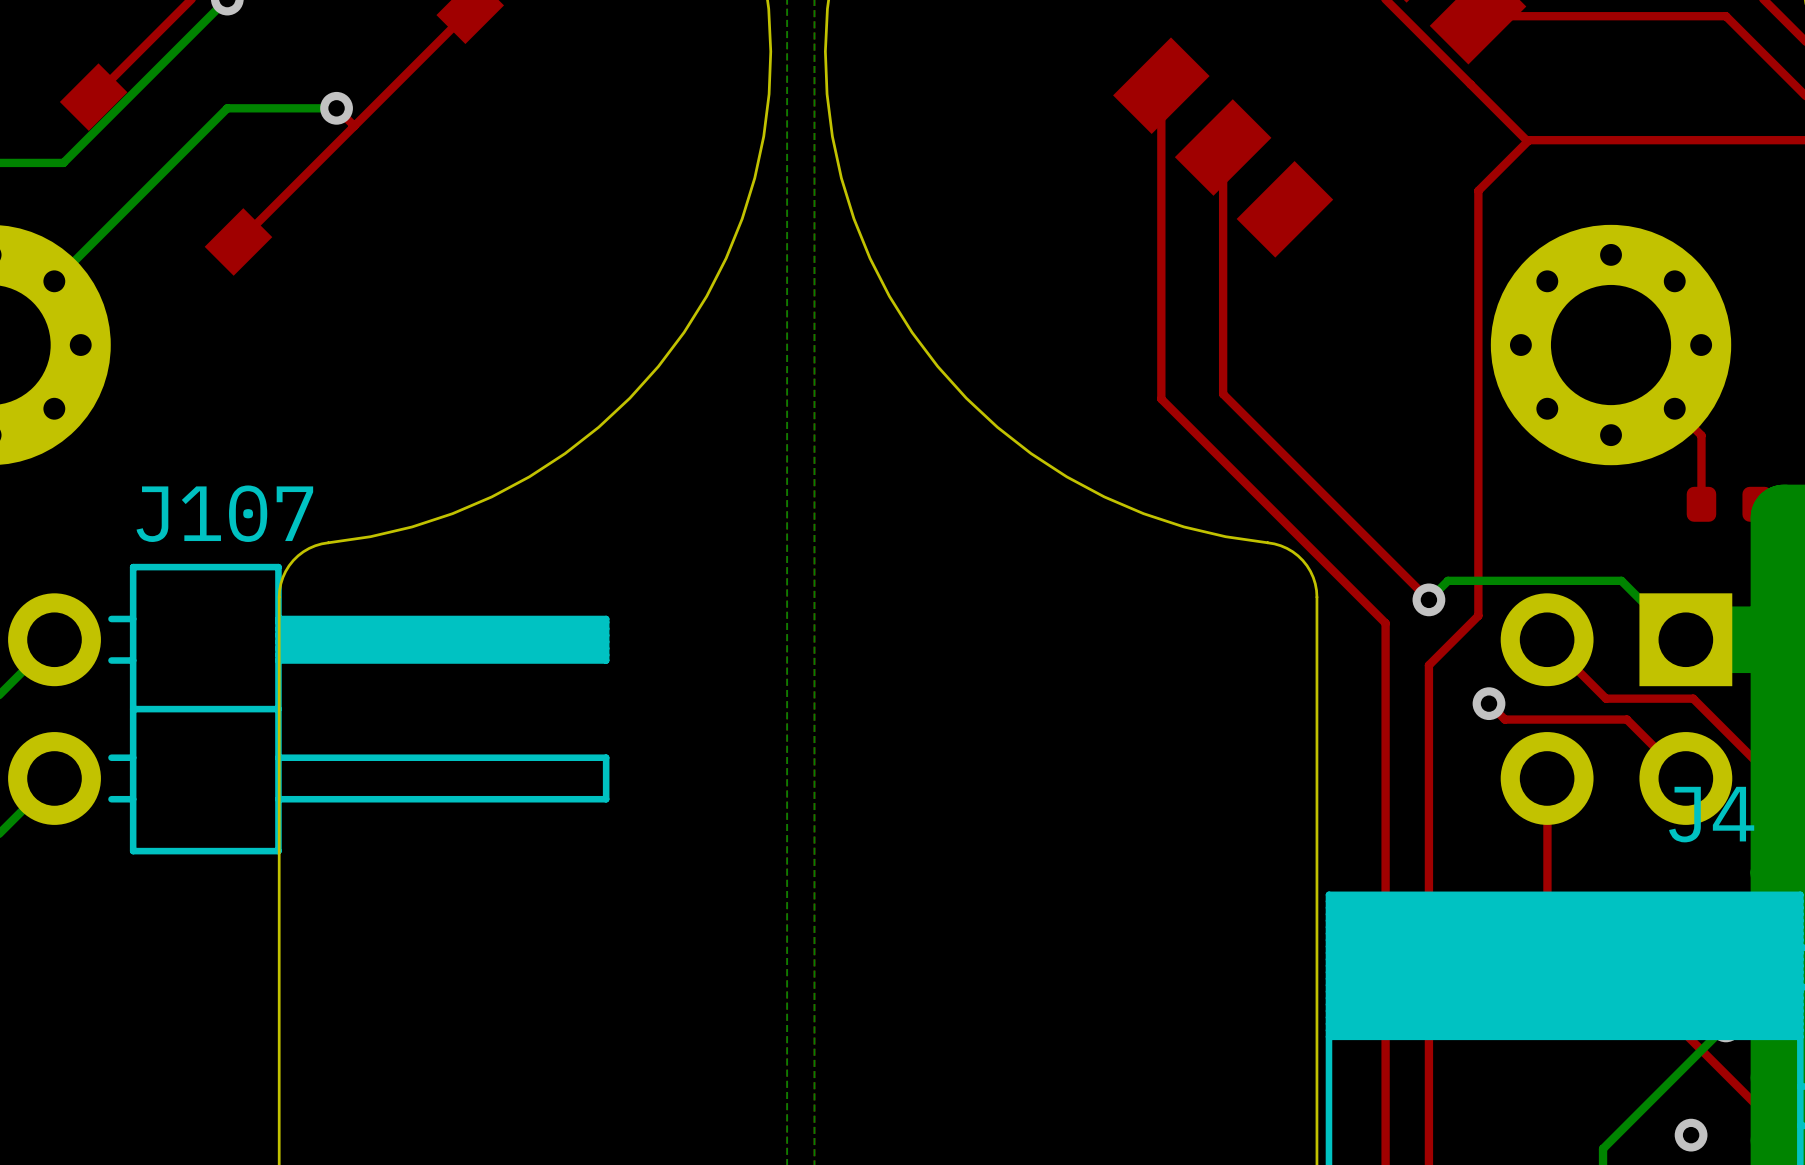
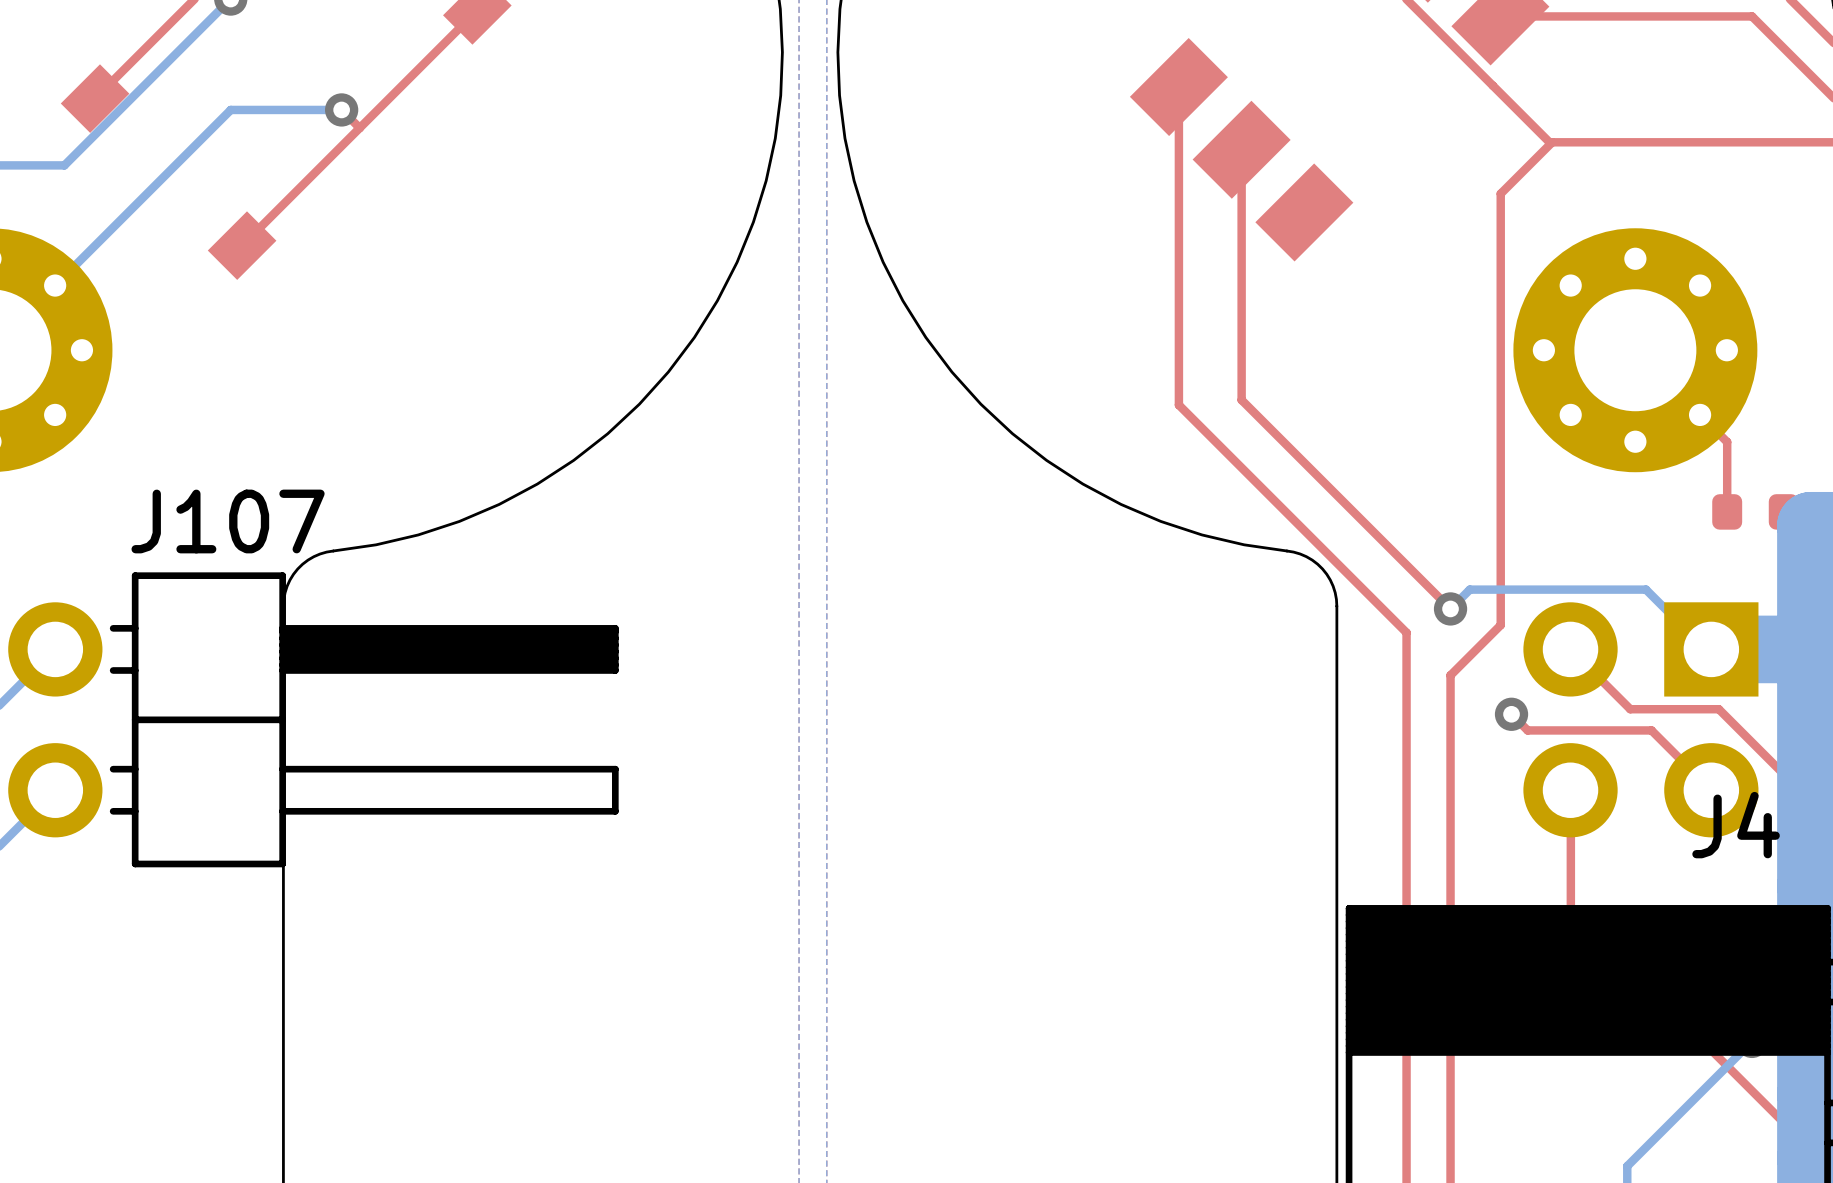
via: (1691, 1135) -> none

